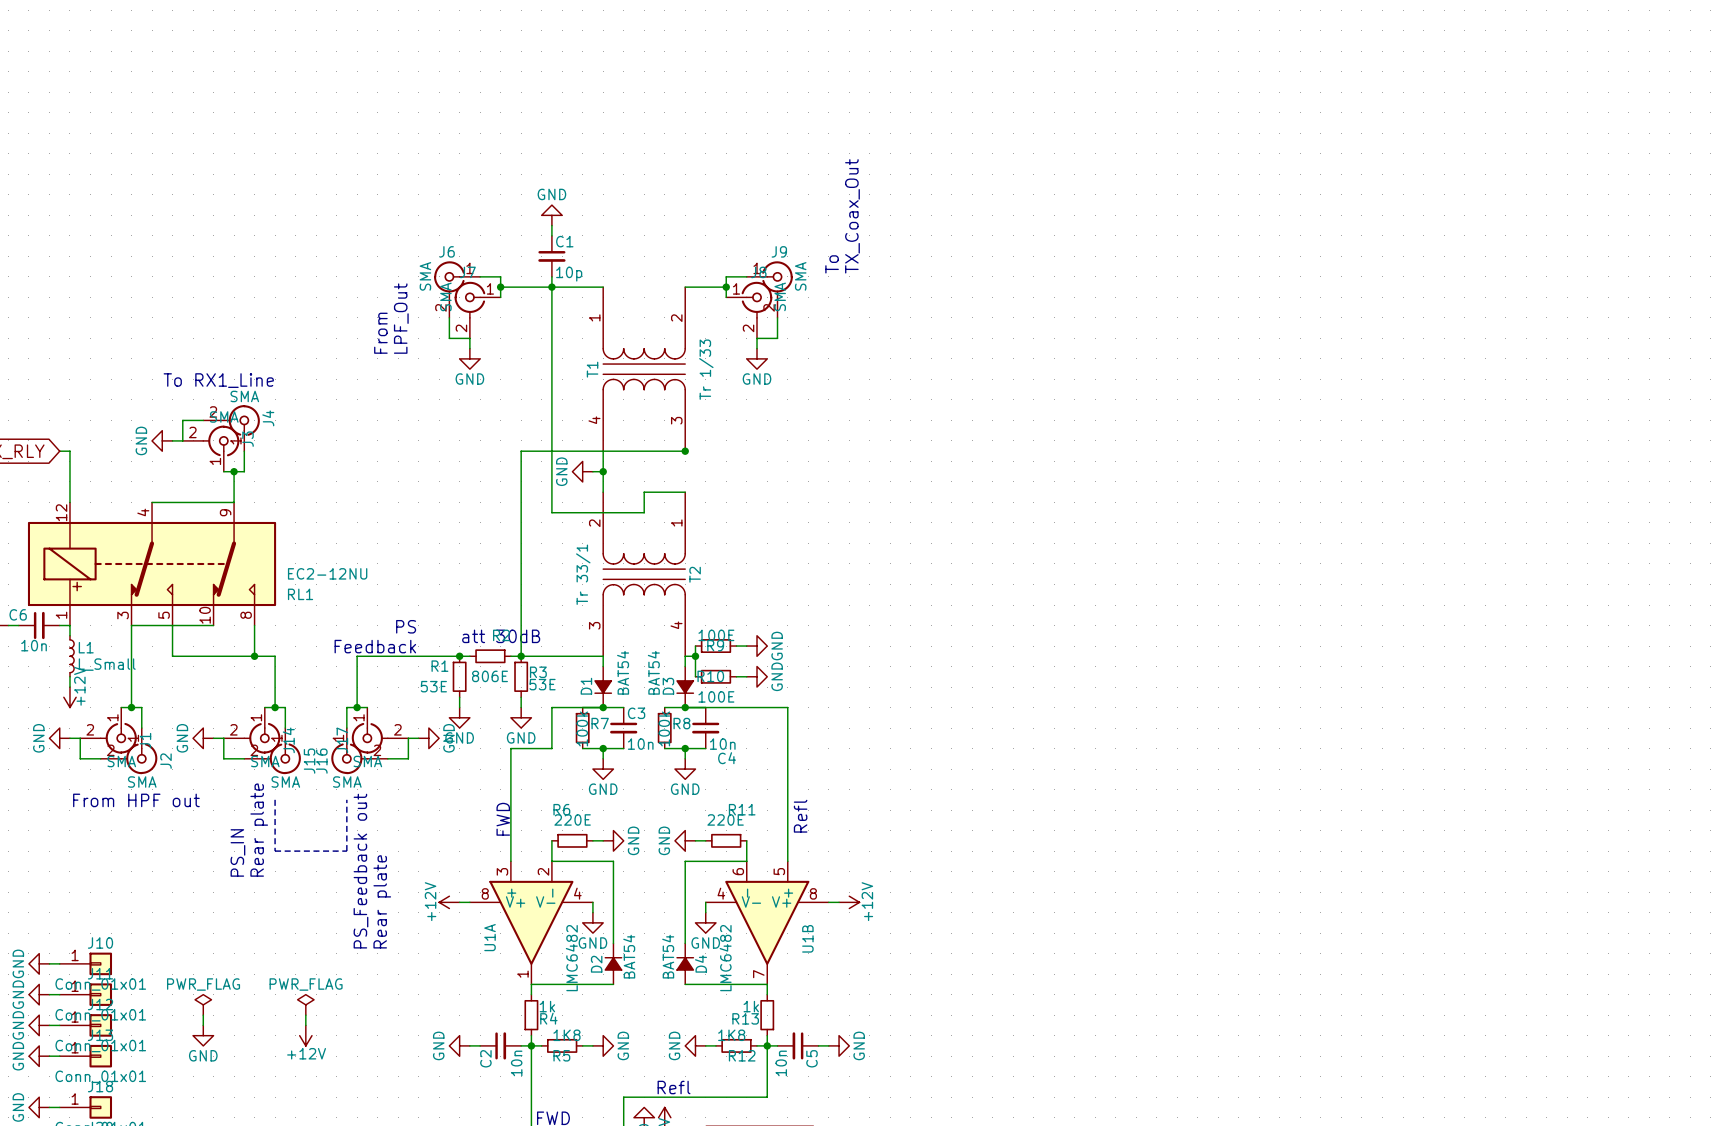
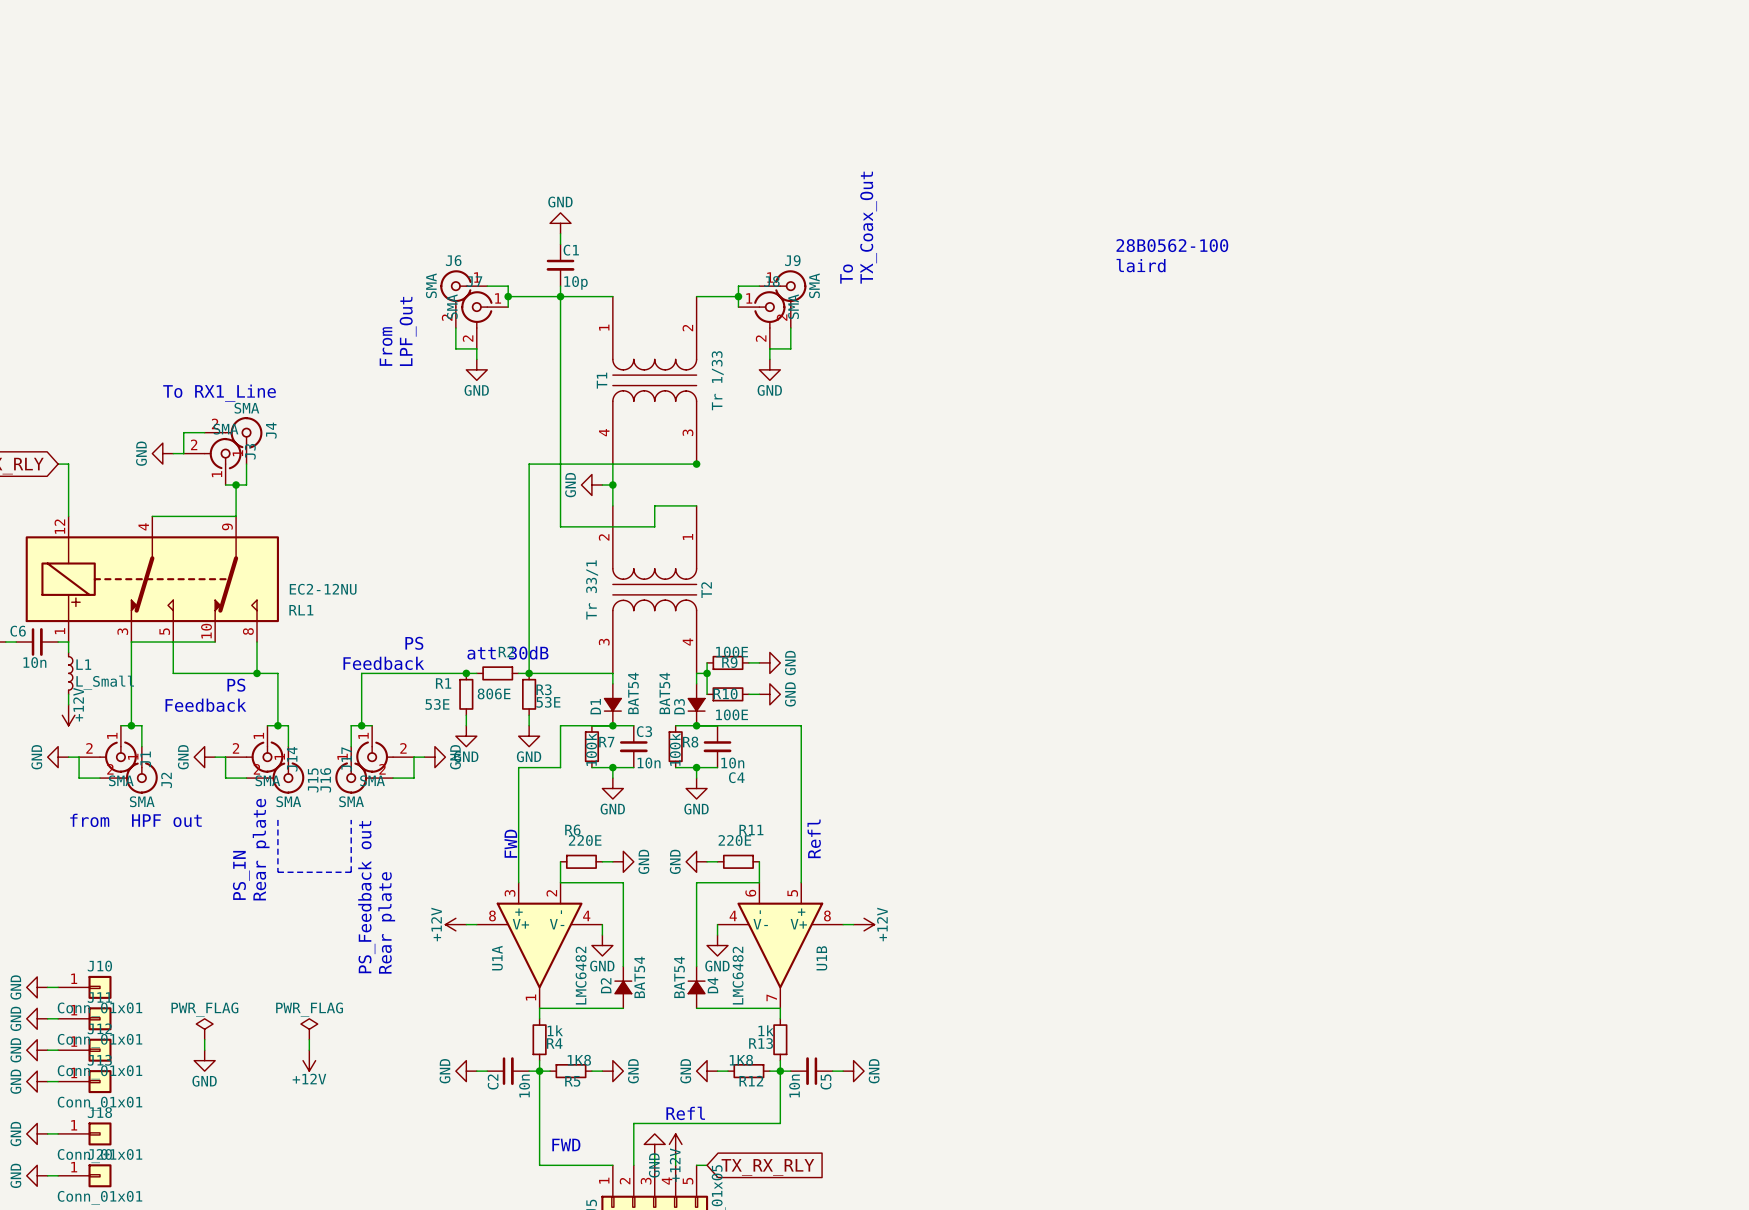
text: none -> 28B0562-100 (1172, 245)
text: none -> laird (1141, 265)
text: none -> PS (236, 685)
text: none -> Feedback (205, 705)
text: From HPF out (136, 800) -> from HPF out (135, 820)

